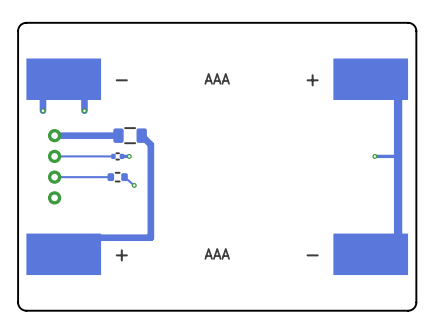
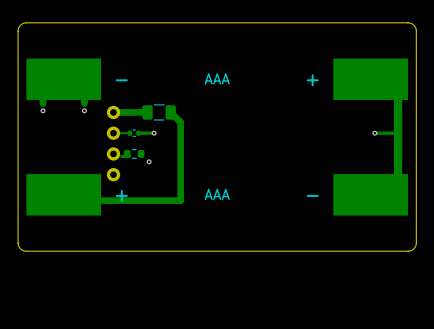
track: (42, 103) (42, 110) -> none
track: (84, 103) (84, 110) -> none
track: none -> (147, 112) (113, 112)
part: none -> (159, 112)
track: none -> (170, 112) (180, 122) (180, 200) (96, 200)
part footprint: [113, 127, 147, 144] -> [127, 129, 141, 137]
track: none -> (130, 133) (113, 133)
track: none -> (154, 133) (138, 133)
via: none -> (154, 133)
track: (118, 135) (54, 135) -> none
track: (141, 135) (150, 144) (150, 237) (96, 237) -> none
track: (113, 156) (54, 156) -> none
part: (117, 156) -> none
via: (129, 156) -> none
via position: (374, 156) -> (374, 133)
track: (398, 156) (374, 156) -> (398, 133) (374, 133)
via: none -> (149, 161)
part position: (54, 166) -> (113, 143)
track: (110, 177) (54, 177) -> none
part position: (117, 177) -> (134, 153)
track: (124, 177) (134, 185) -> none
track: (398, 178) (398, 237) -> none
via: (134, 185) -> none
board edge: (416, 242) (416, 303) (413, 308) (408, 310) (25, 310) (20, 308) (18, 303) (18, 242) -> (416, 242) (413, 248) (408, 251) (26, 251) (20, 248) (18, 242)
text position: AAA (217, 253) -> AAA (217, 194)
part position: (63, 254) -> (63, 194)
part position: (370, 254) -> (370, 194)
text position: + (121, 255) -> + (121, 195)
text position: - (312, 255) -> - (312, 195)

